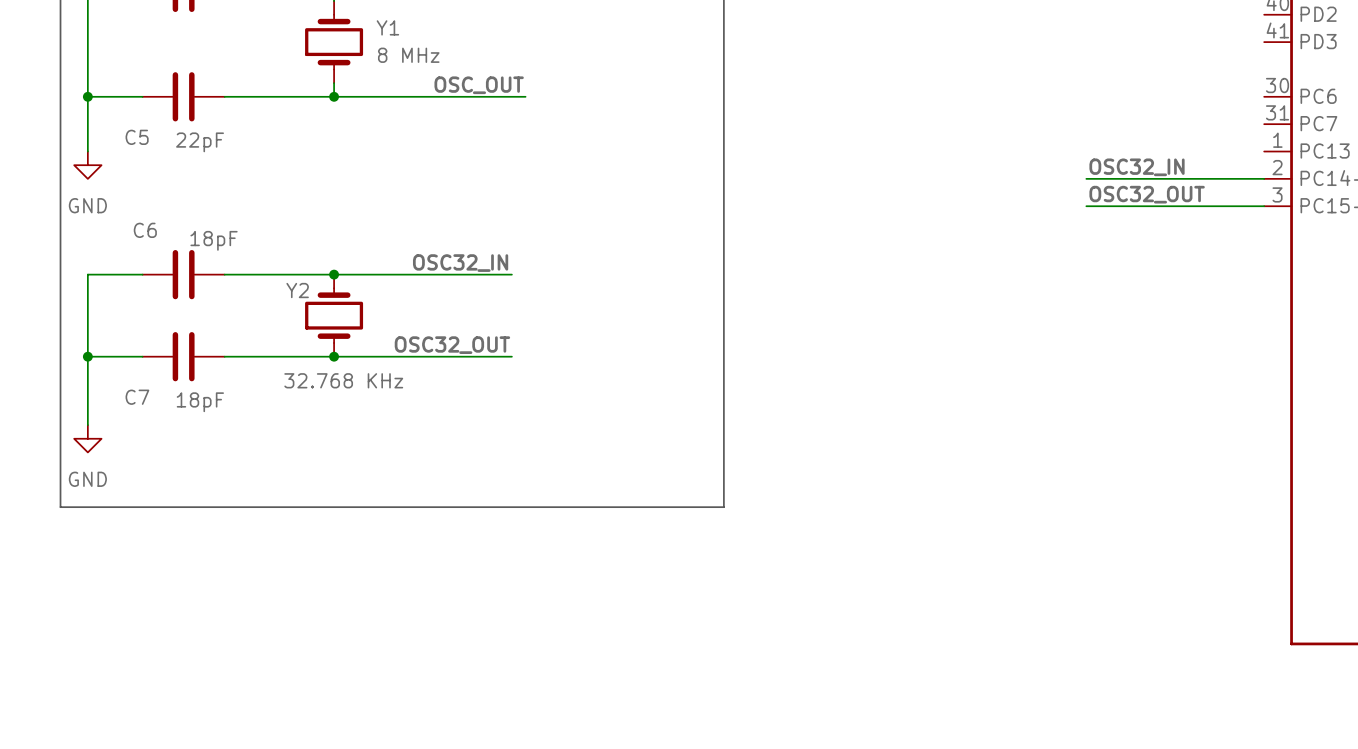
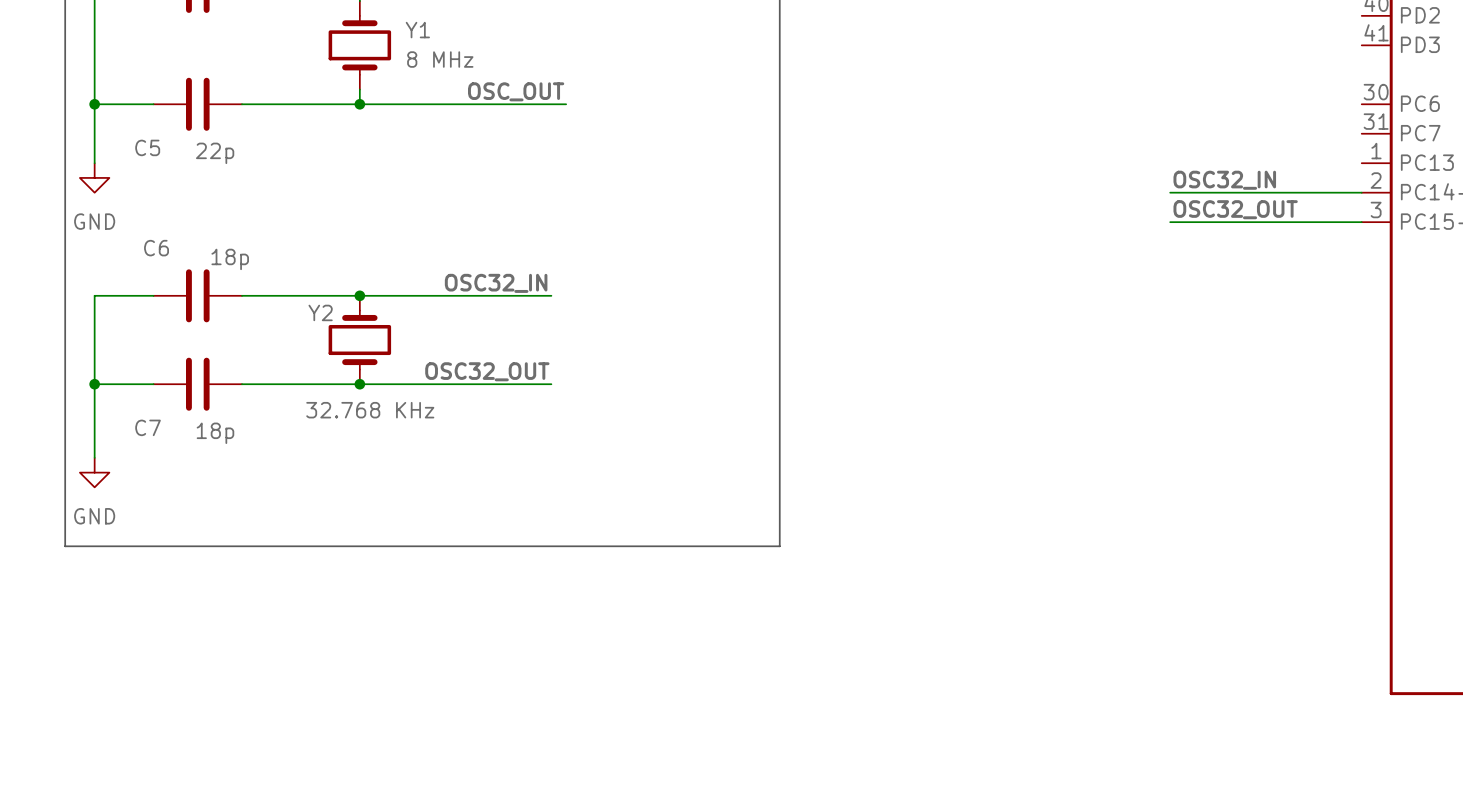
C5 value: 22pF (200, 142) -> 22p (215, 153)
C6 value: 18pF (214, 240) -> 18p (230, 259)
C7 value: 18pF (200, 402) -> 18p (215, 433)

